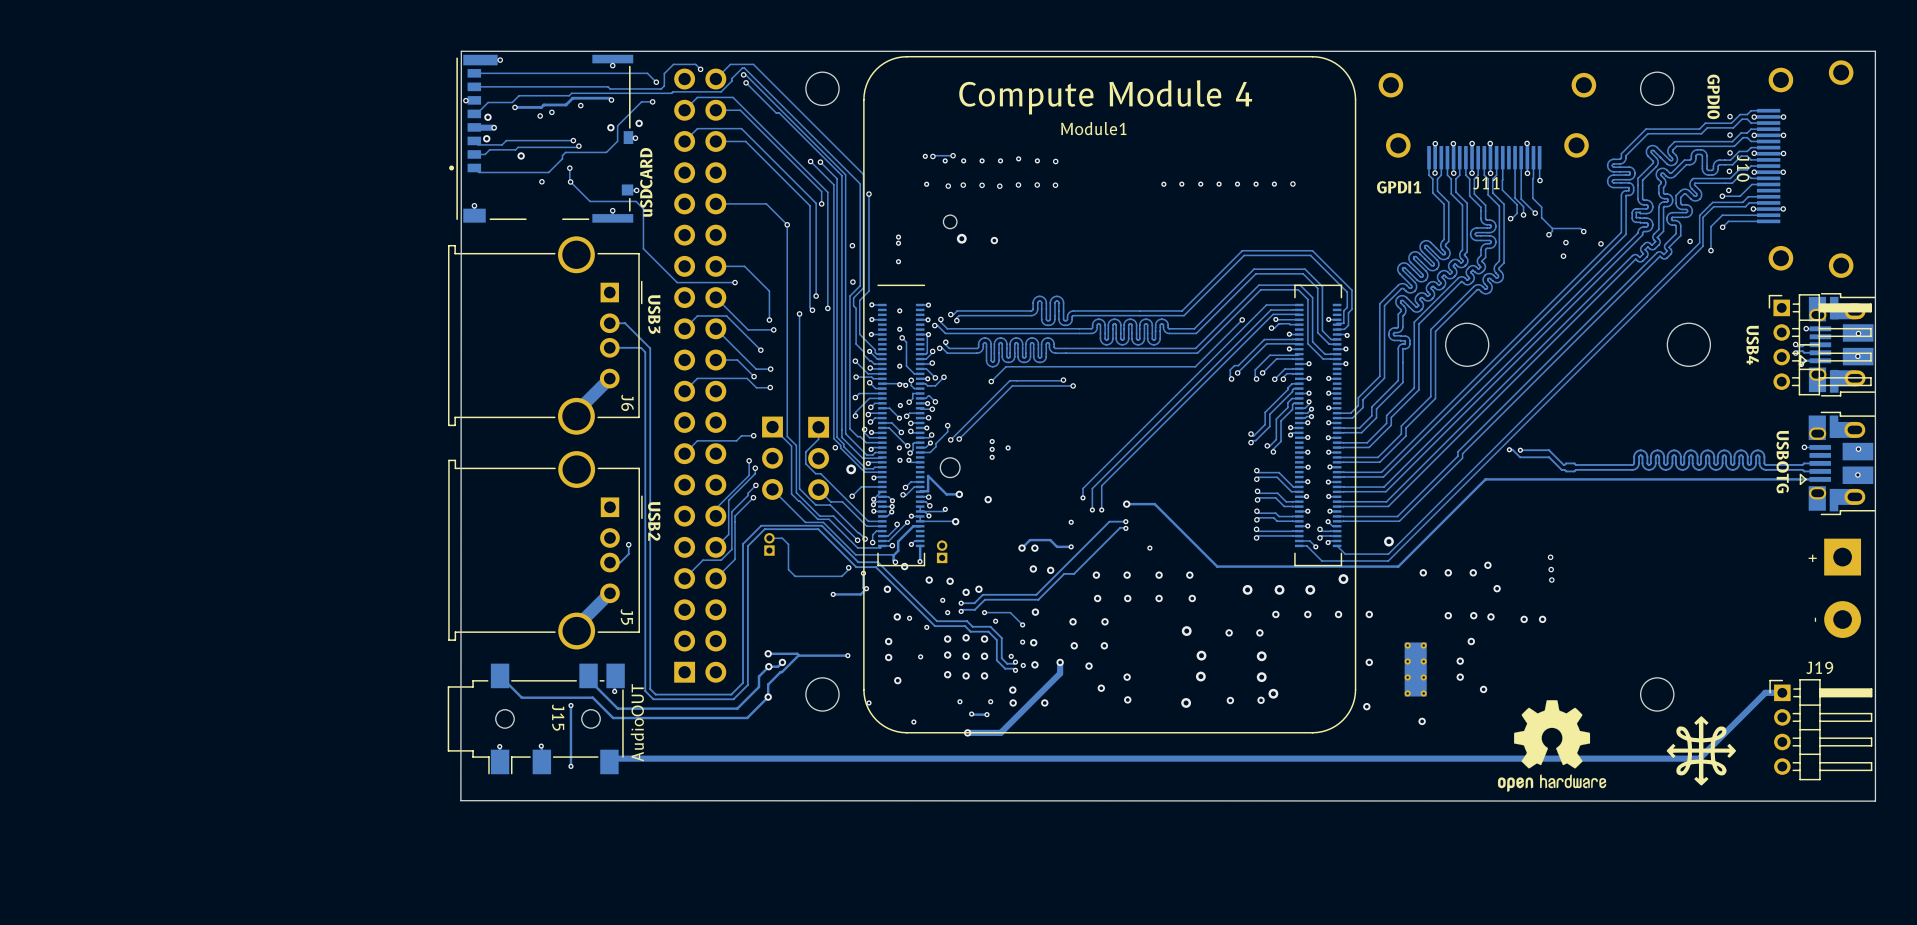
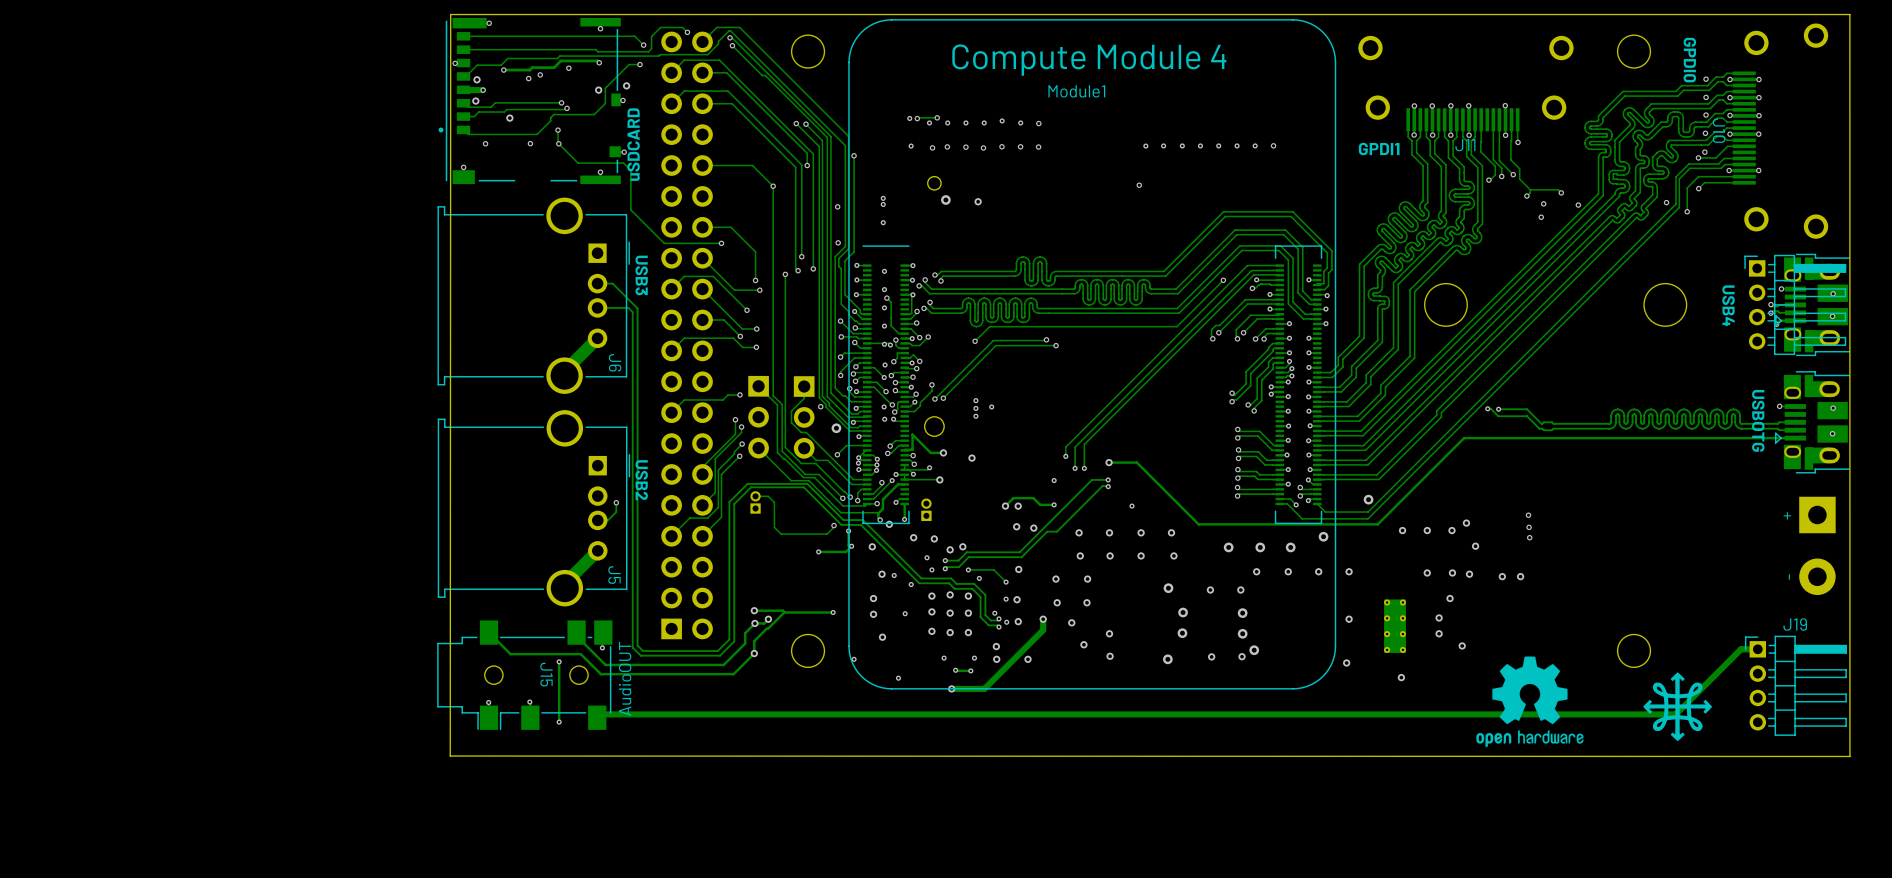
via: none -> (485, 143)
via: none -> (1139, 185)

